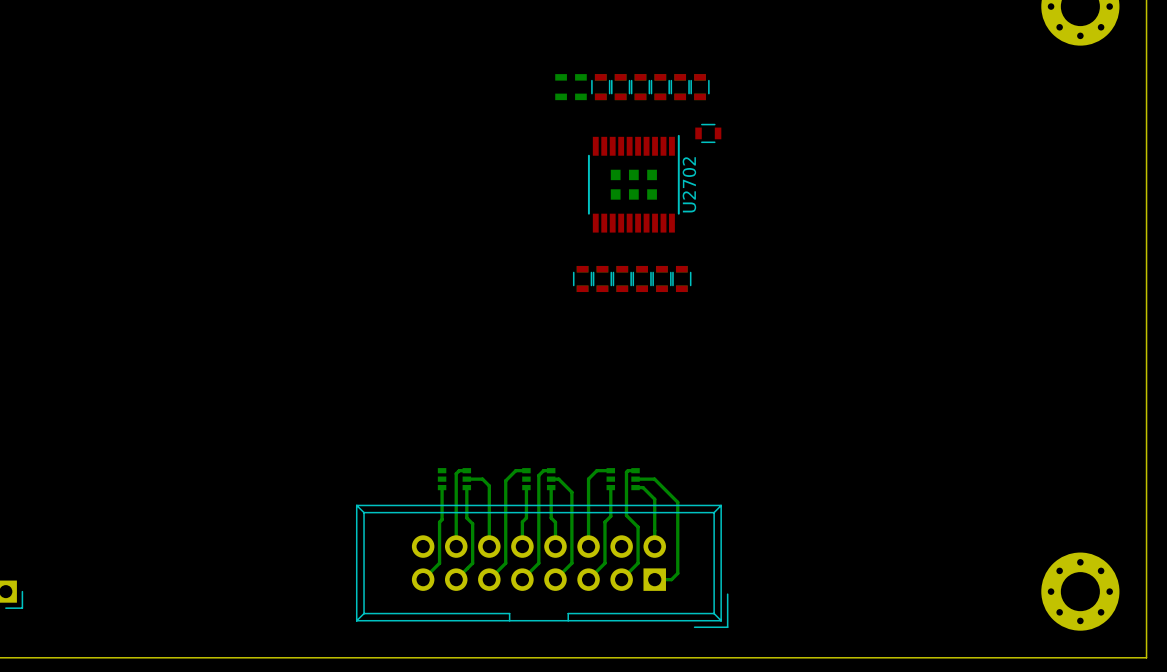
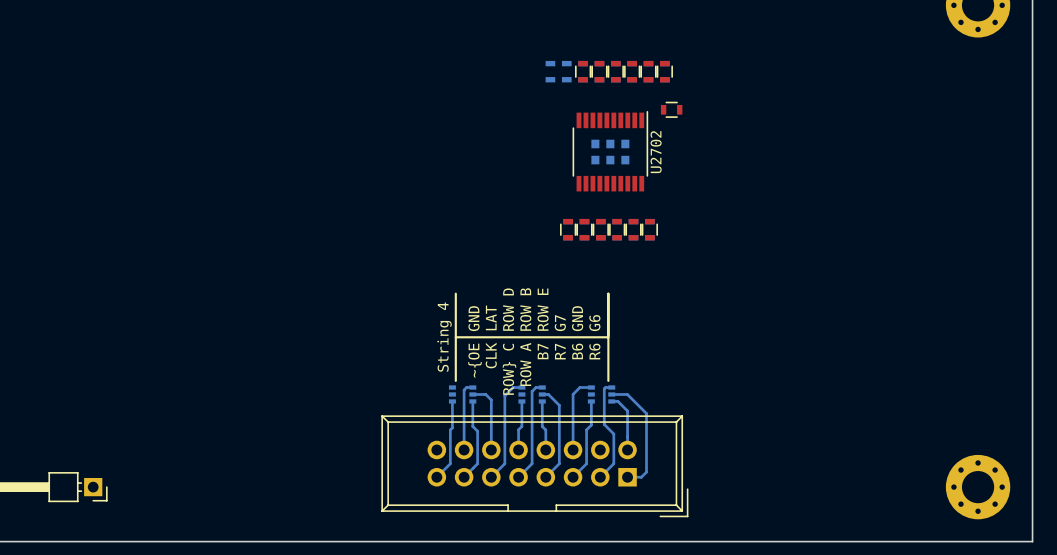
line: none -> (455, 293) (455, 380)
line: none -> (608, 293) (608, 380)
text: none -> ROW D (508, 309)
text: none -> ROW B (525, 309)
text: none -> ROW E (543, 309)
text: none -> GND (473, 318)
text: none -> GND (577, 318)
text: none -> LAT (491, 317)
text: none -> G7 (560, 323)
text: none -> G6 (594, 323)
text: none -> String 4 (444, 337)
line: none -> (455, 337) (608, 337)
text: none -> B7 (543, 351)
text: none -> B6 (577, 351)
text: none -> R6 (594, 351)
text: none -> R7 (560, 351)
text: none -> CLK (491, 355)
text: none -> ~{OE (474, 360)
text: none -> ROW A (525, 364)
text: none -> ROW} C (509, 369)

